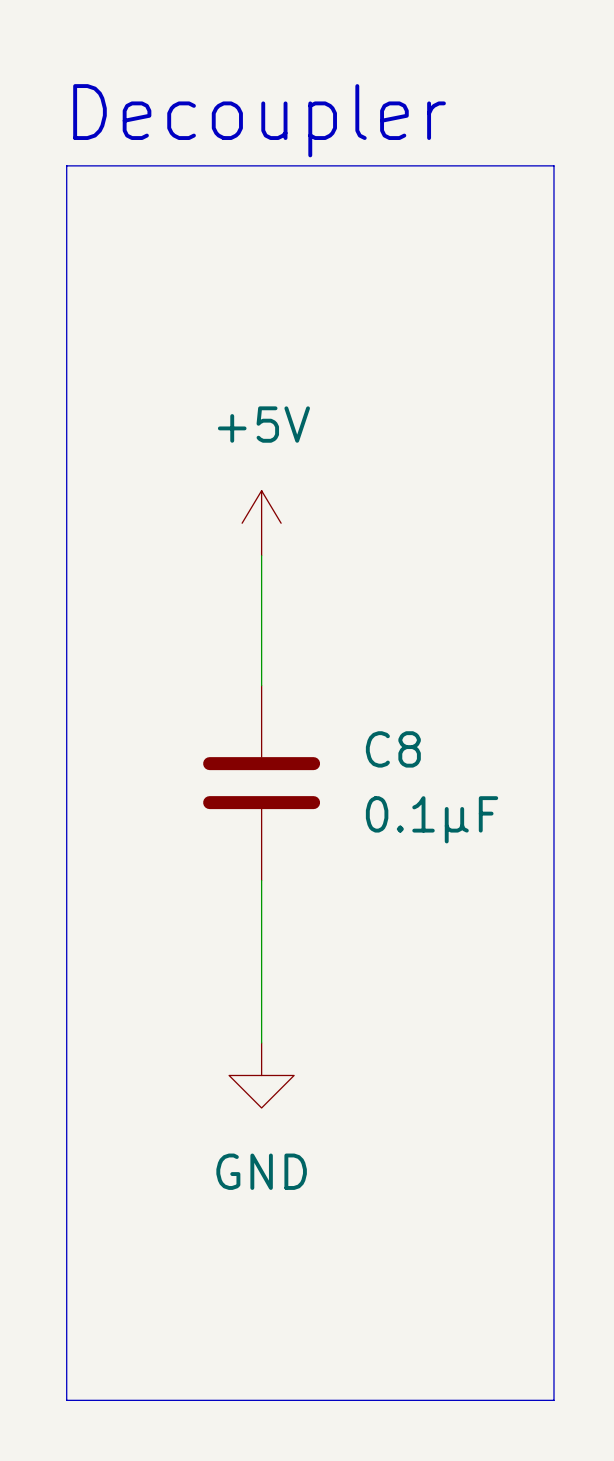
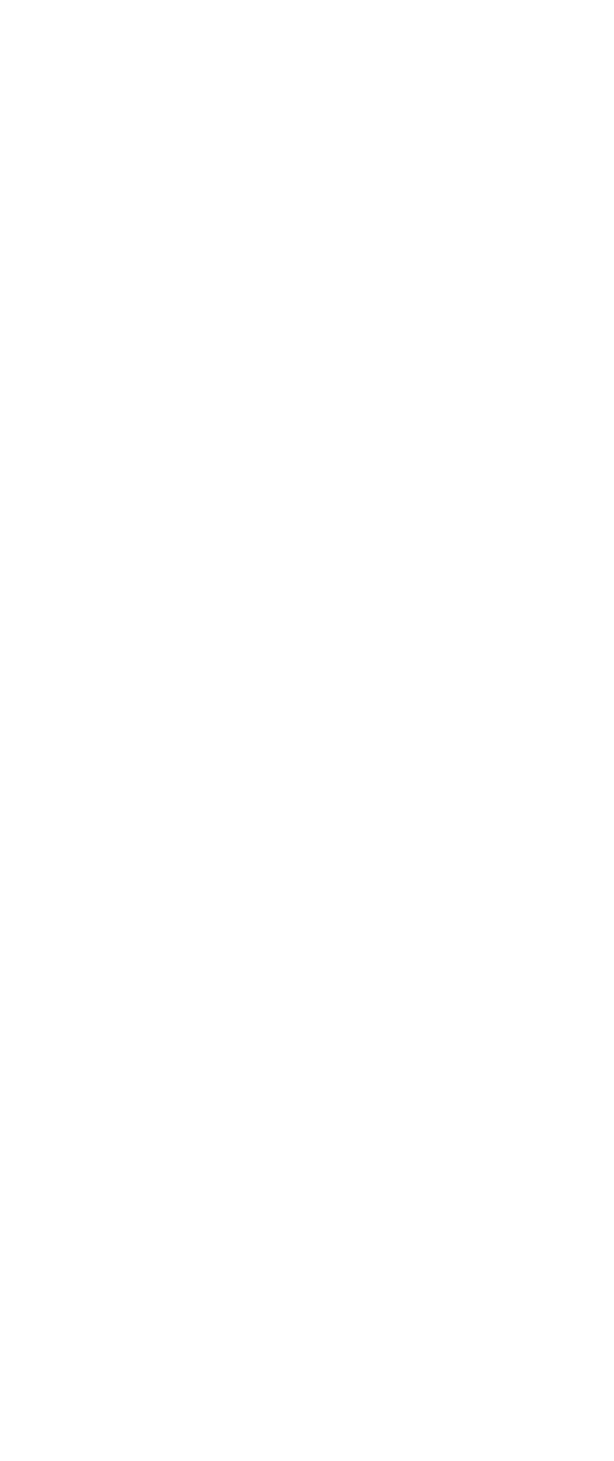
text: Decoupler (259, 120) -> none
line: (66, 165) (553, 165) (553, 1400) (66, 1400) (66, 165) -> none
power symbol: +5V (261, 523) -> none
wire: (261, 555) (261, 685) -> none
C8: 0.1µF (261, 783) -> none
wire: (261, 880) (261, 1043) -> none
power symbol: GND (261, 1075) -> none

